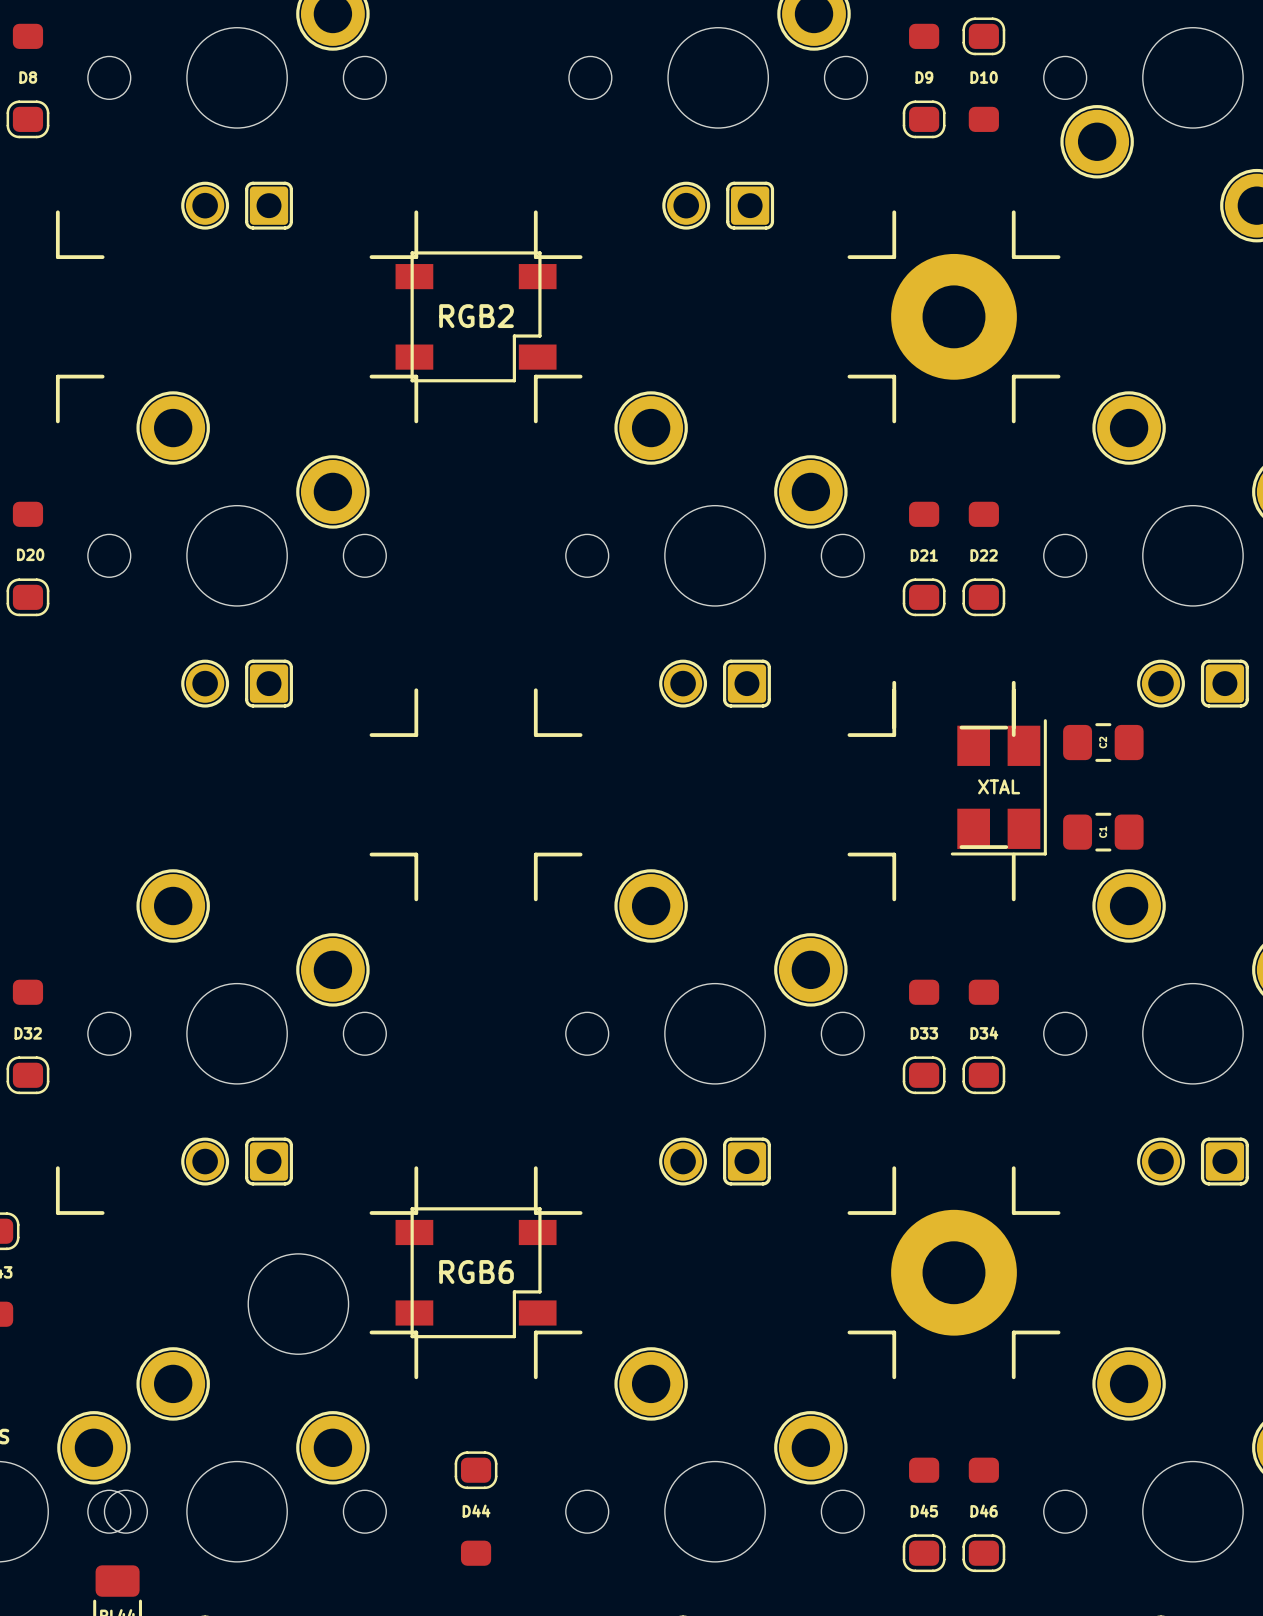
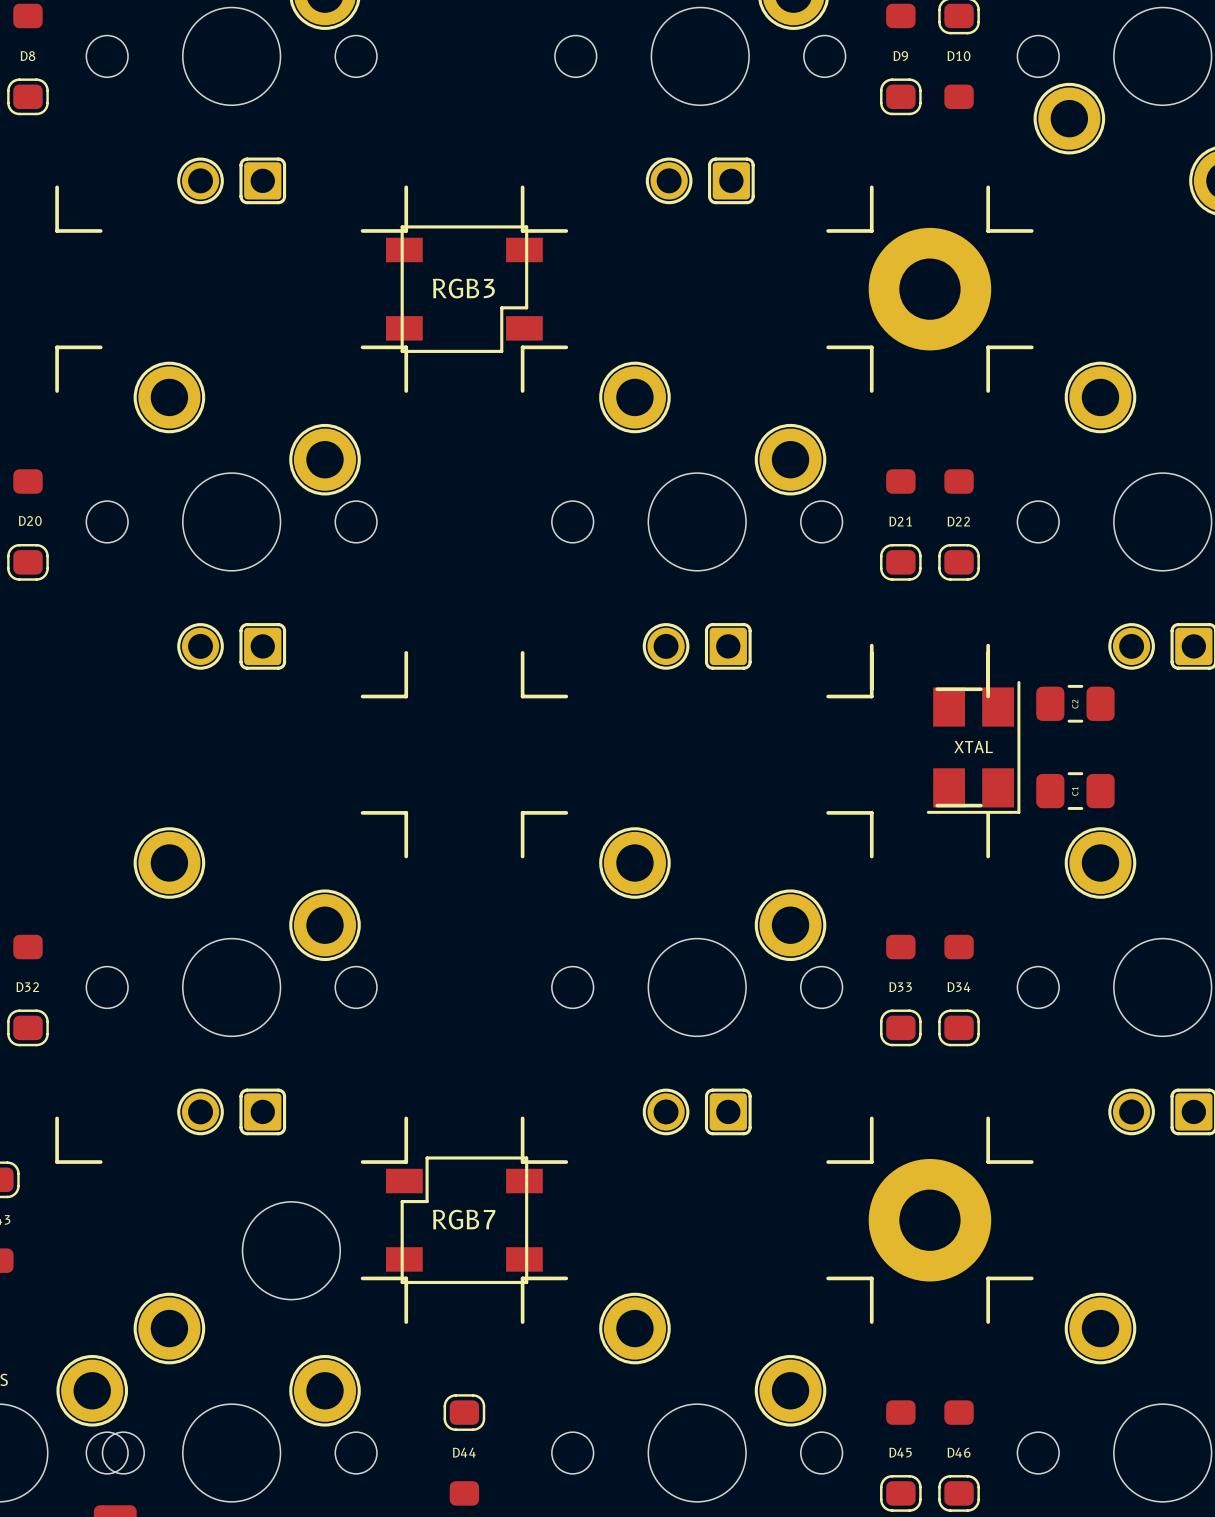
RGB2 name: RGB2 (476, 316) -> RGB3 (463, 288)
RGB6: (476, 1272) -> none
RGB7: none -> (464, 1220)

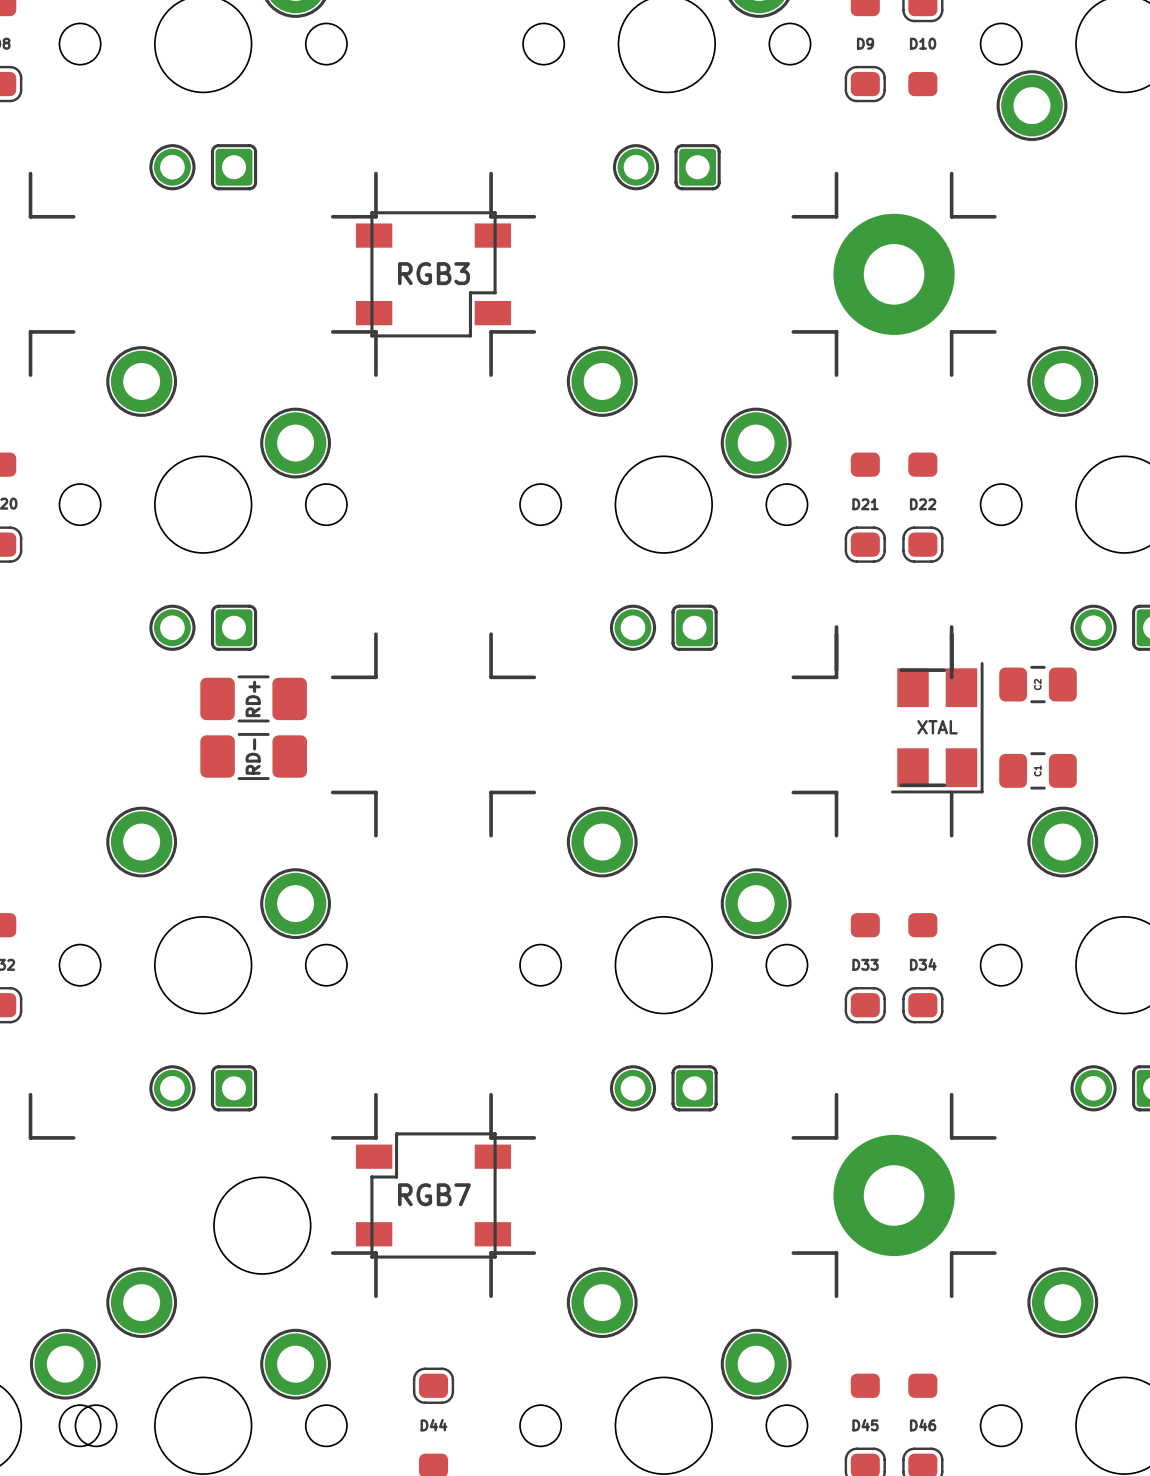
part: none -> (253, 698)
text: none -> RD+ (253, 698)
part: none -> (253, 756)
text: none -> RD- (253, 756)

